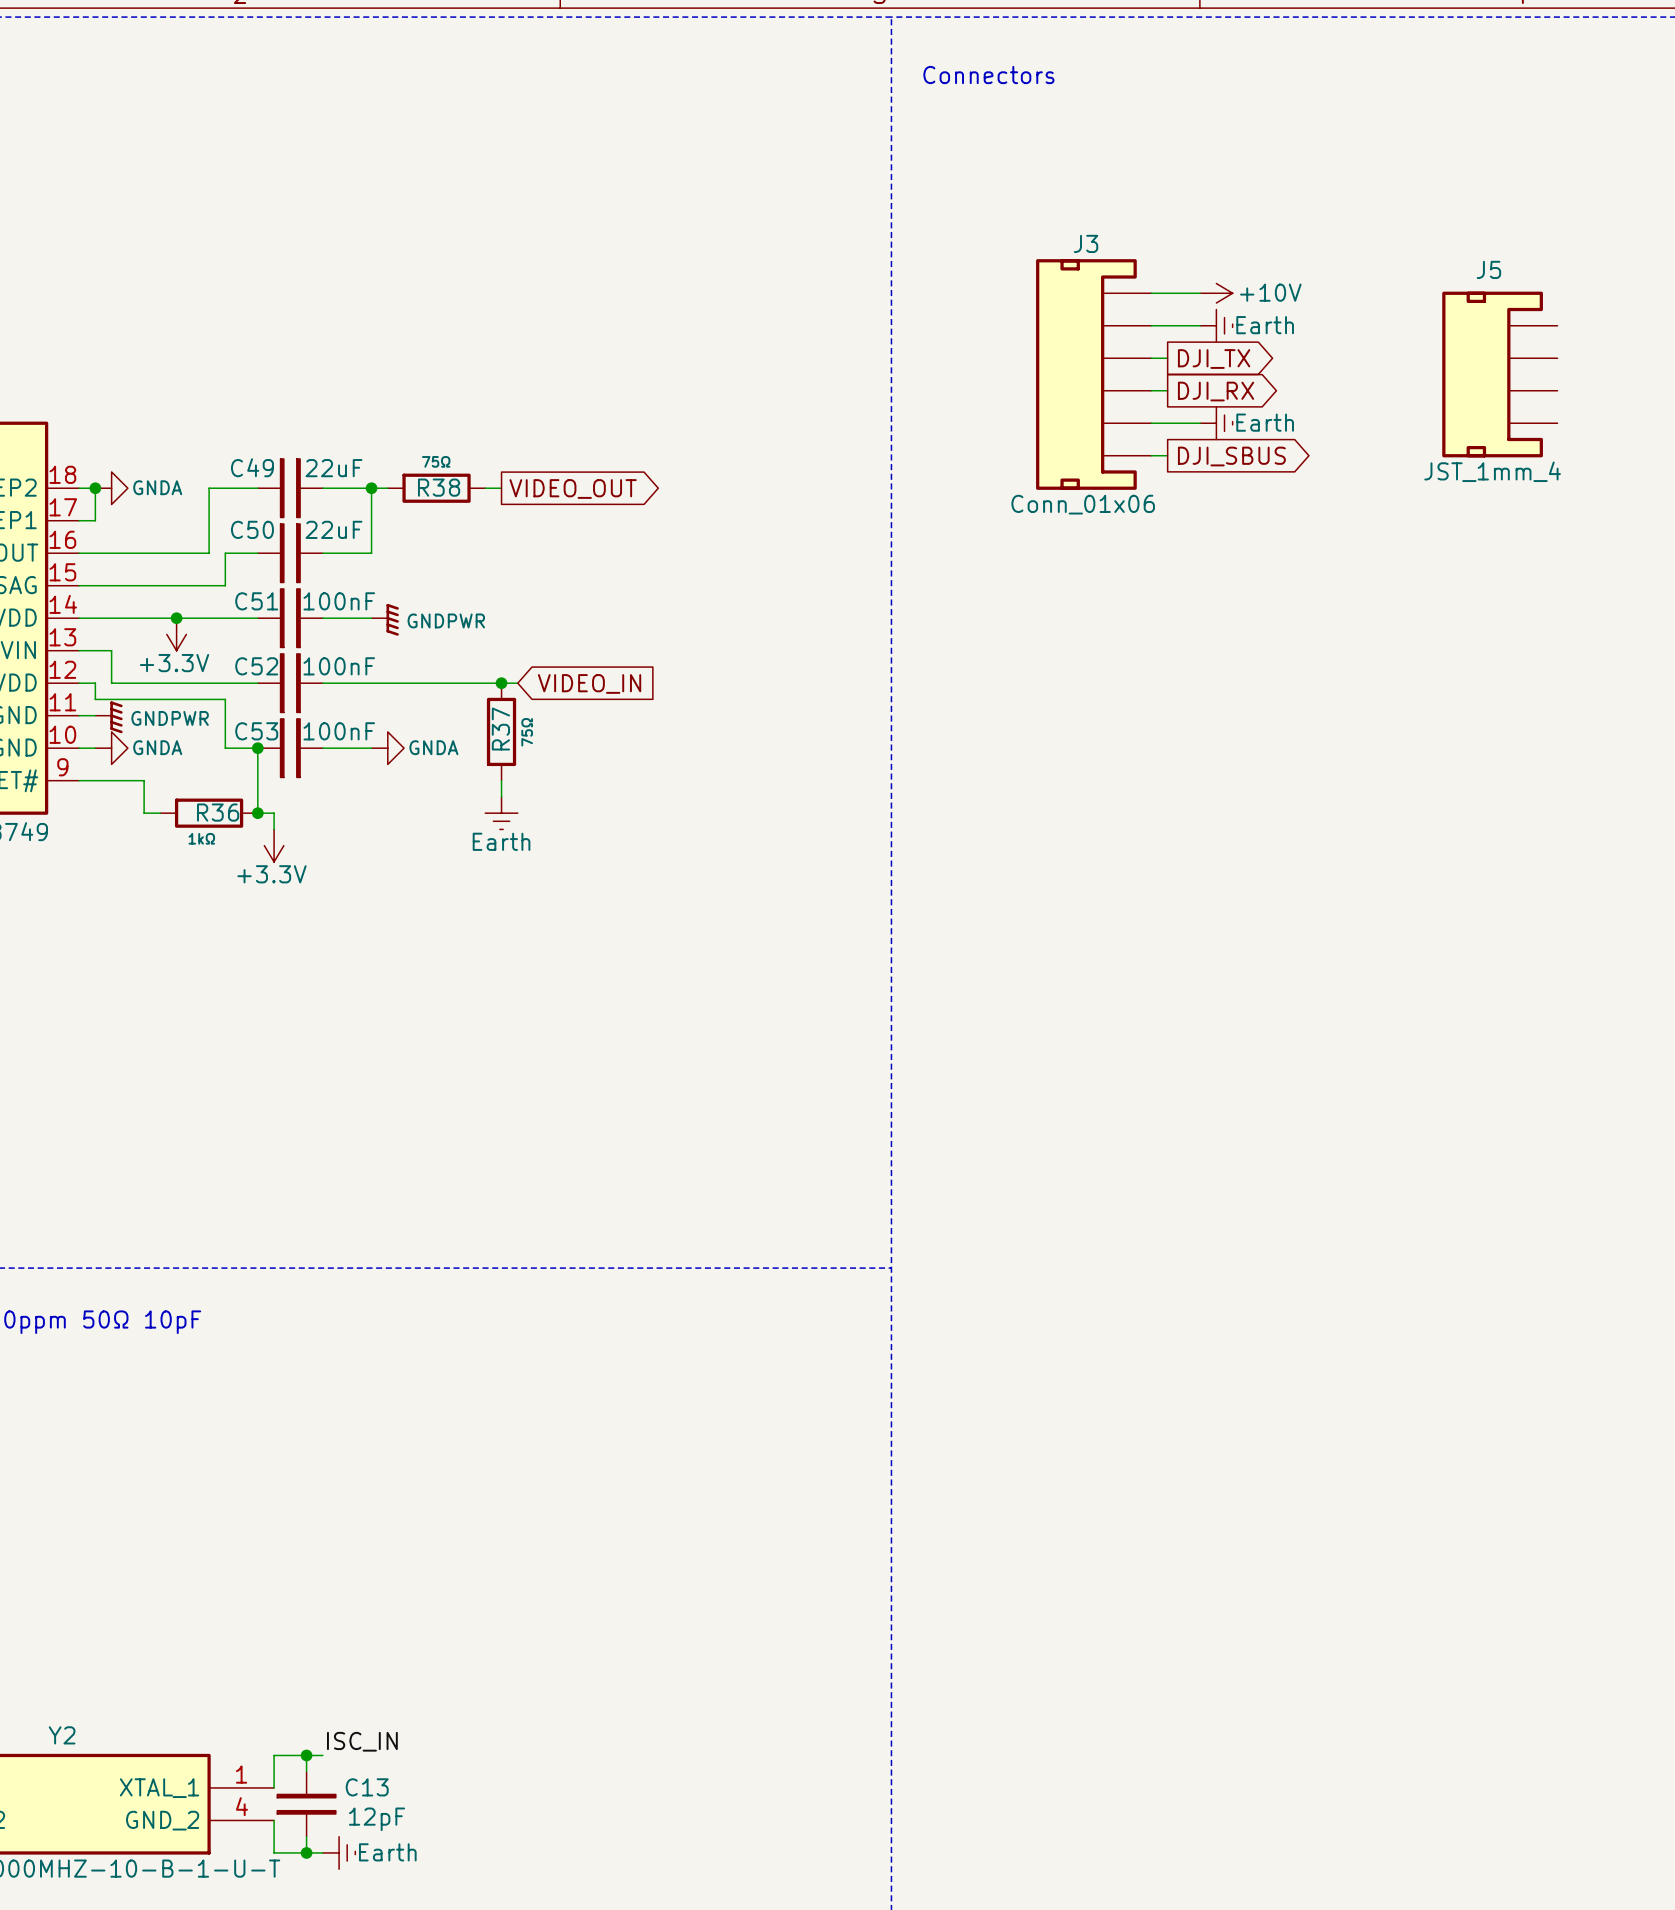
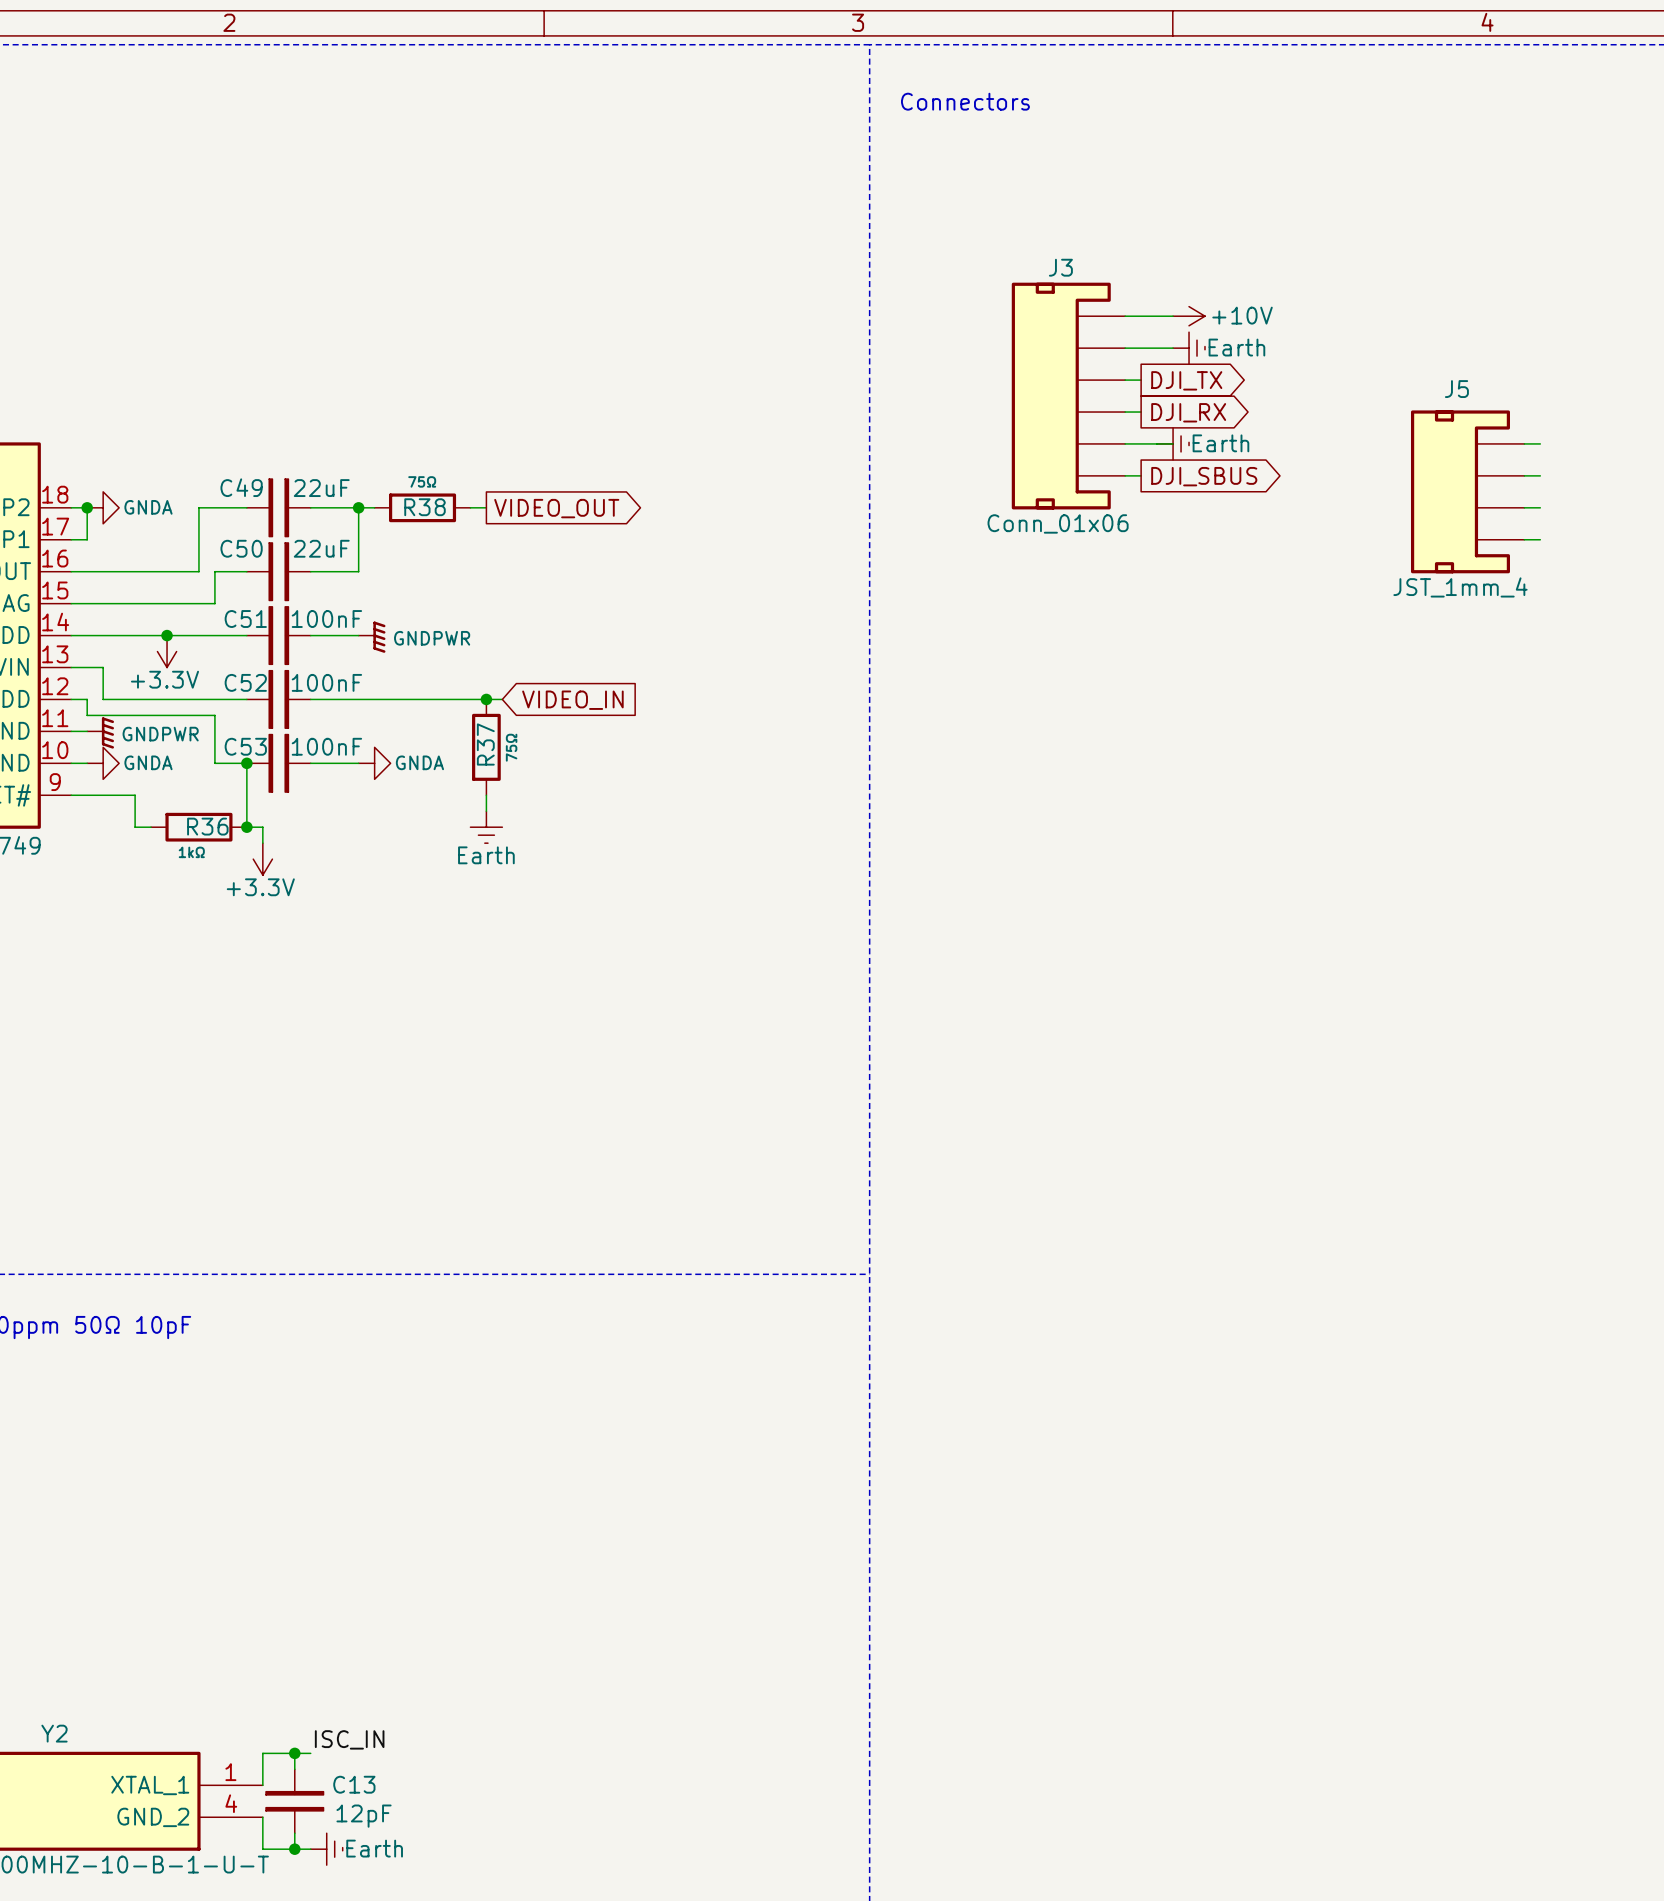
J5 position: (1499, 374) -> (1467, 491)
power symbol position: Earth (1216, 423) -> Earth (1173, 443)
wire: none -> (1524, 443) (1540, 443)
wire: none -> (1524, 475) (1540, 475)
wire: none -> (1524, 507) (1540, 507)
wire: none -> (1524, 539) (1540, 539)

